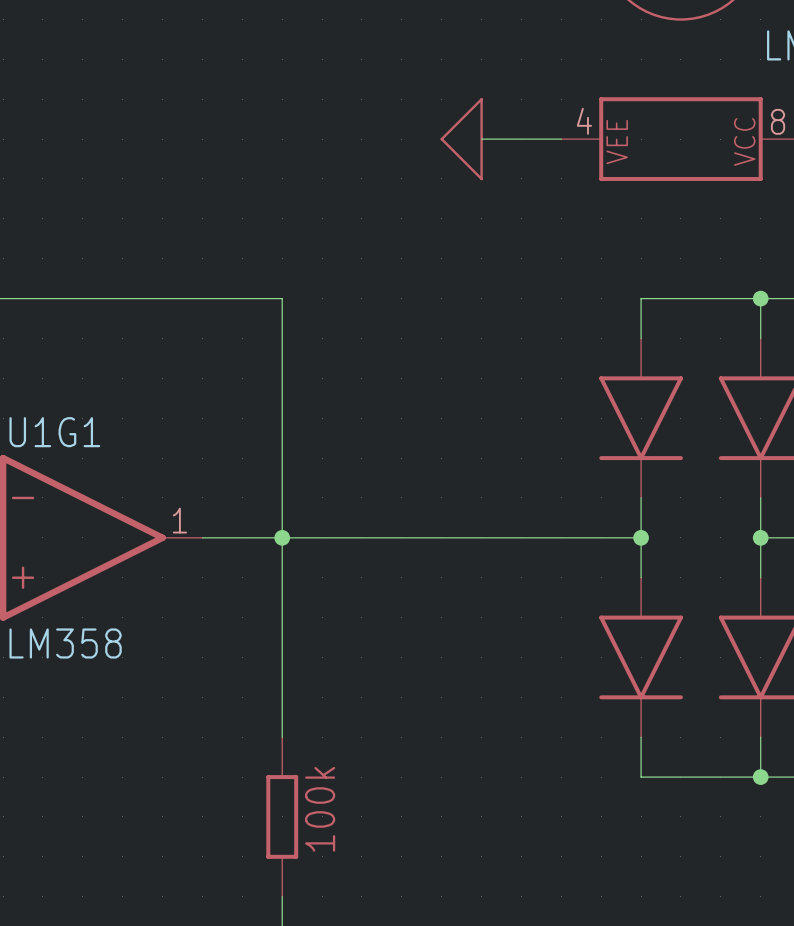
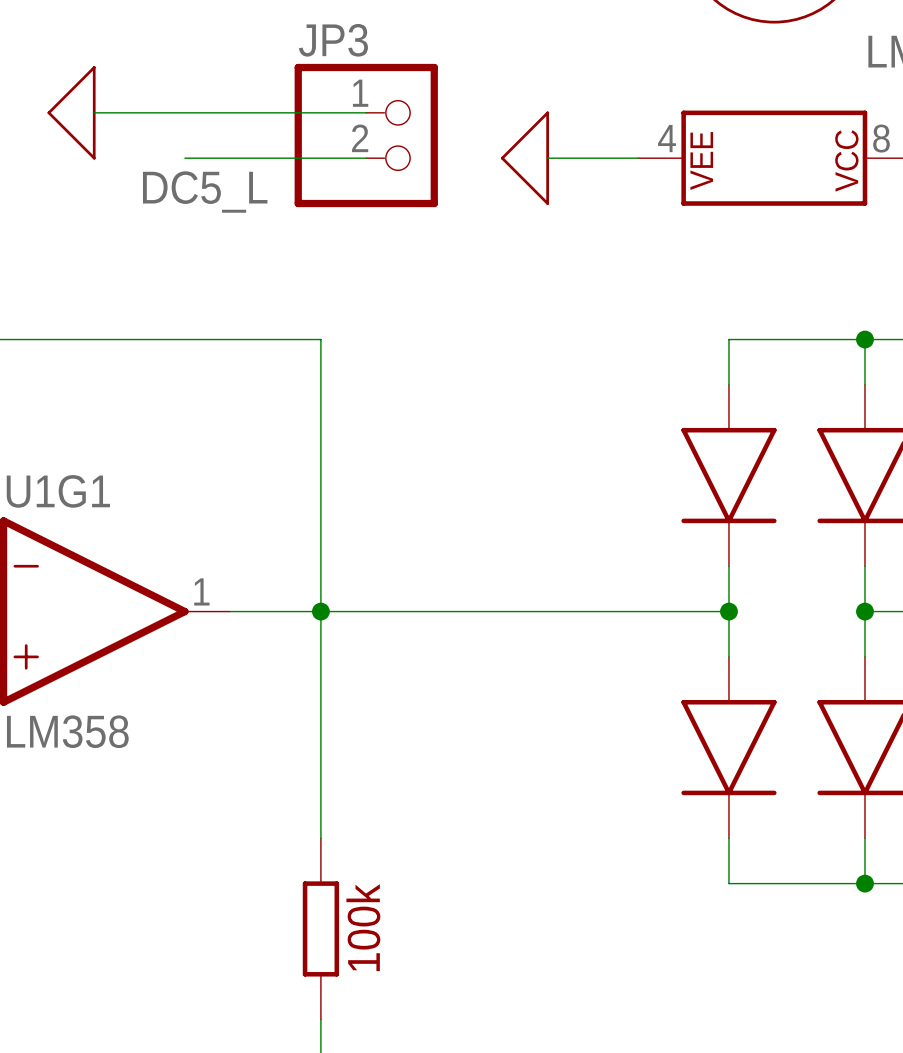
power symbol: none -> (71, 112)
wire: none -> (94, 112) (366, 112)
JP3: none -> (366, 135)
wire: none -> (184, 158) (366, 158)
label: none -> DC5_L (205, 191)

